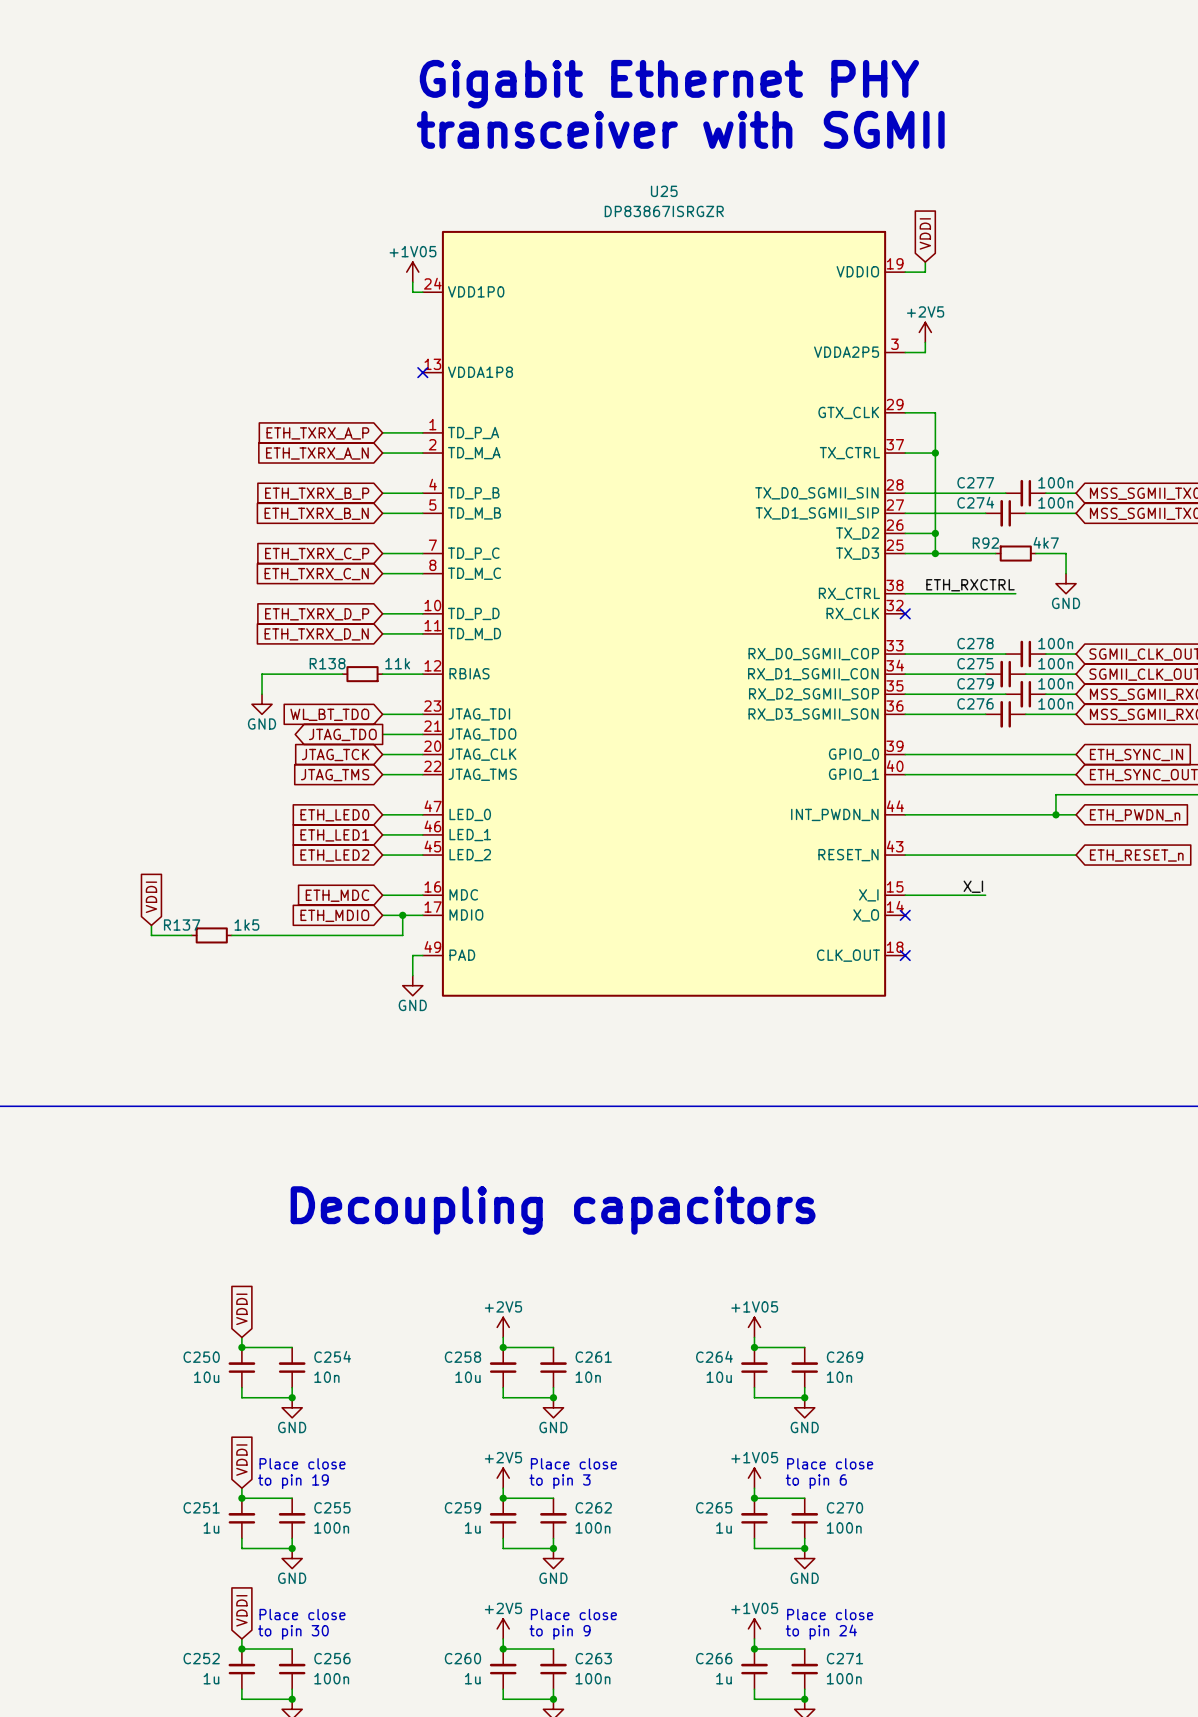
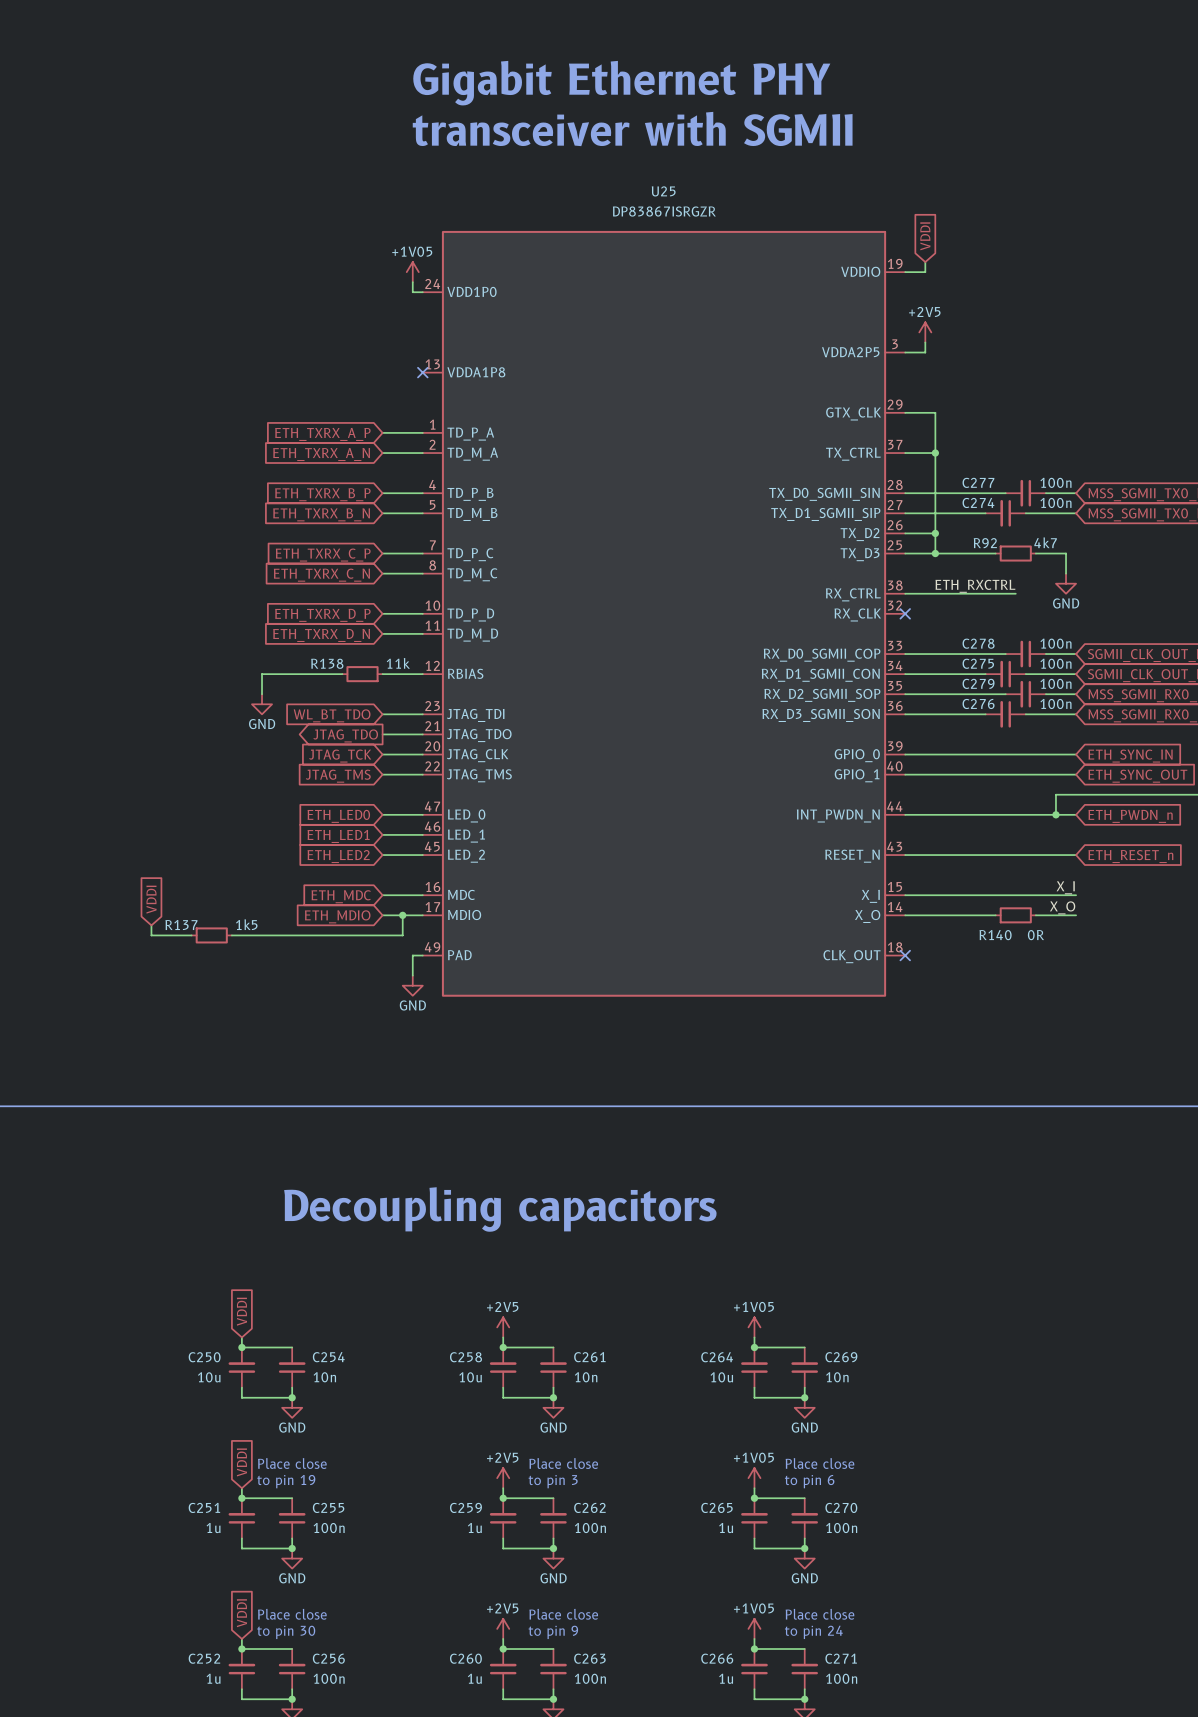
label position: X_I (973, 886) -> X_I (1065, 887)
wire: none -> (985, 895) (1076, 895)
label: none -> X_O (1062, 907)
wire: none -> (905, 915) (995, 915)
no-connect mark: (905, 915) -> none
R140: none -> (1015, 915)
wire: none -> (1035, 915) (1076, 915)

